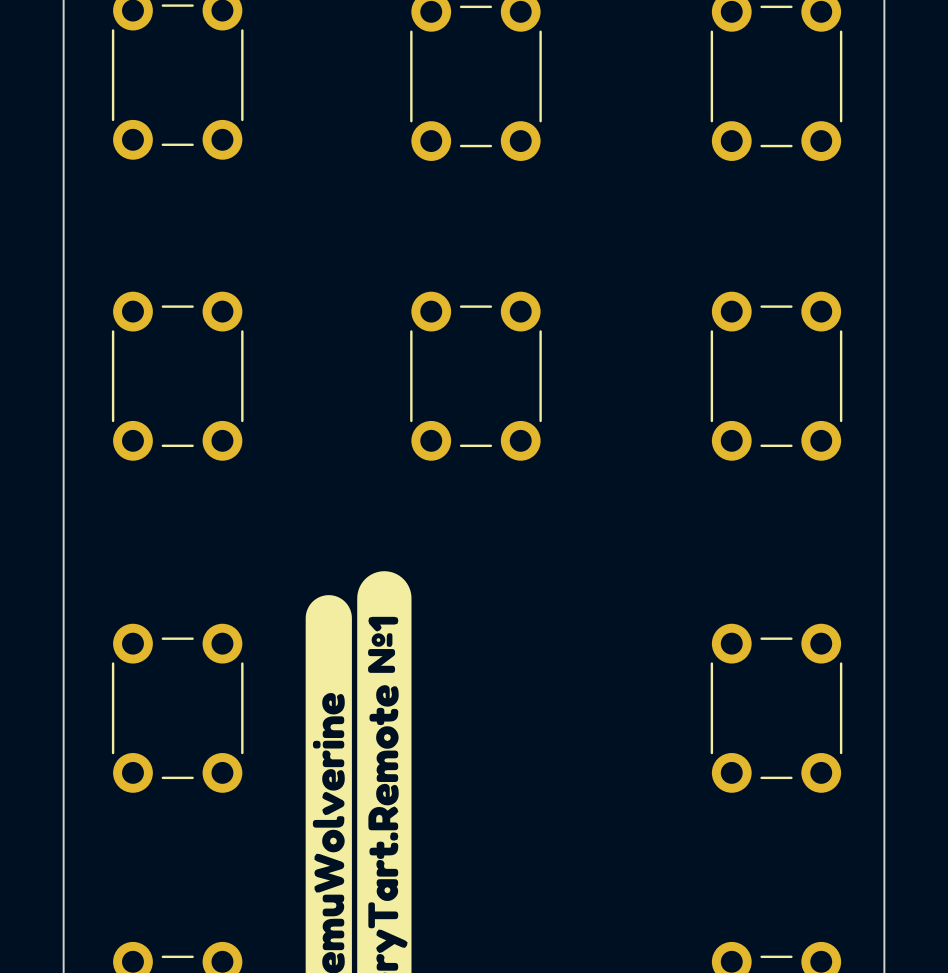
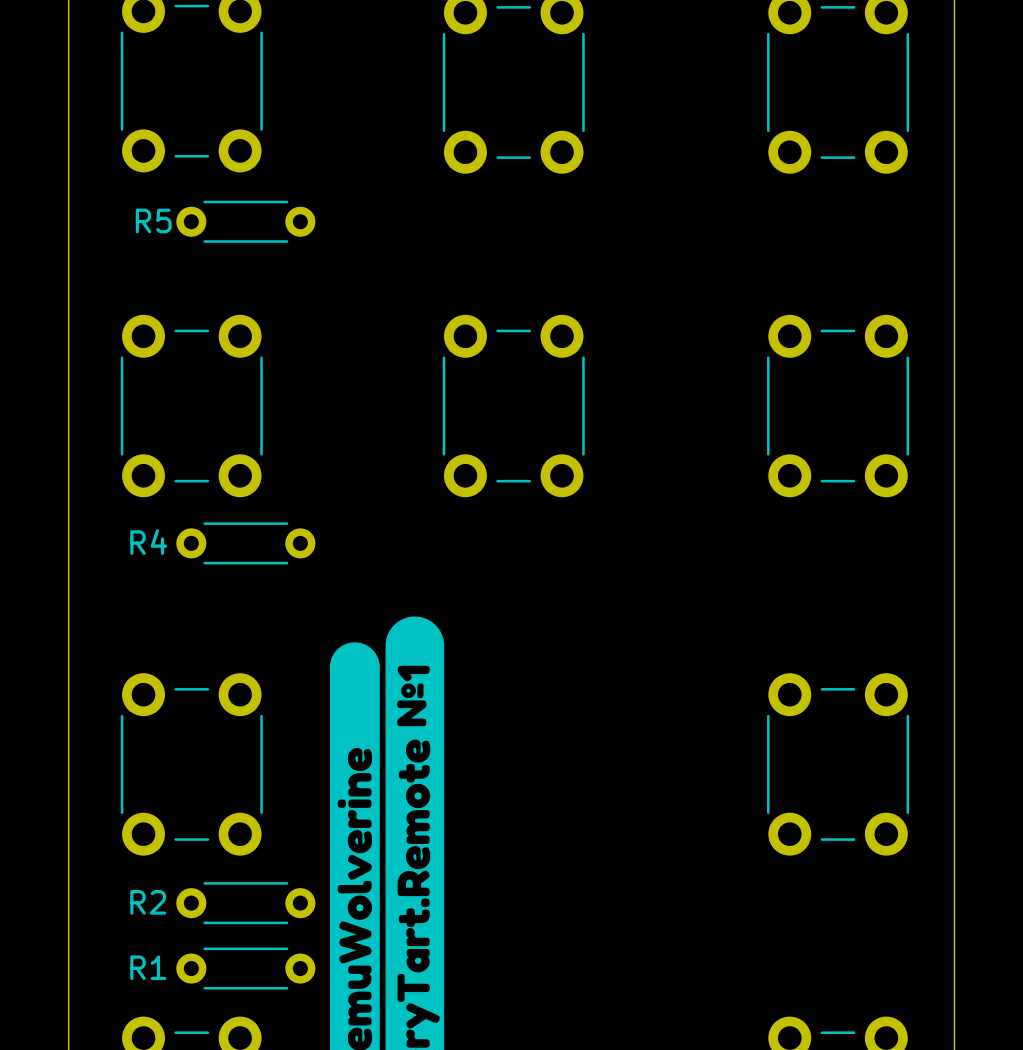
R5: none -> (245, 221)
R4: none -> (245, 543)
R2: none -> (245, 903)
R1: none -> (245, 968)

